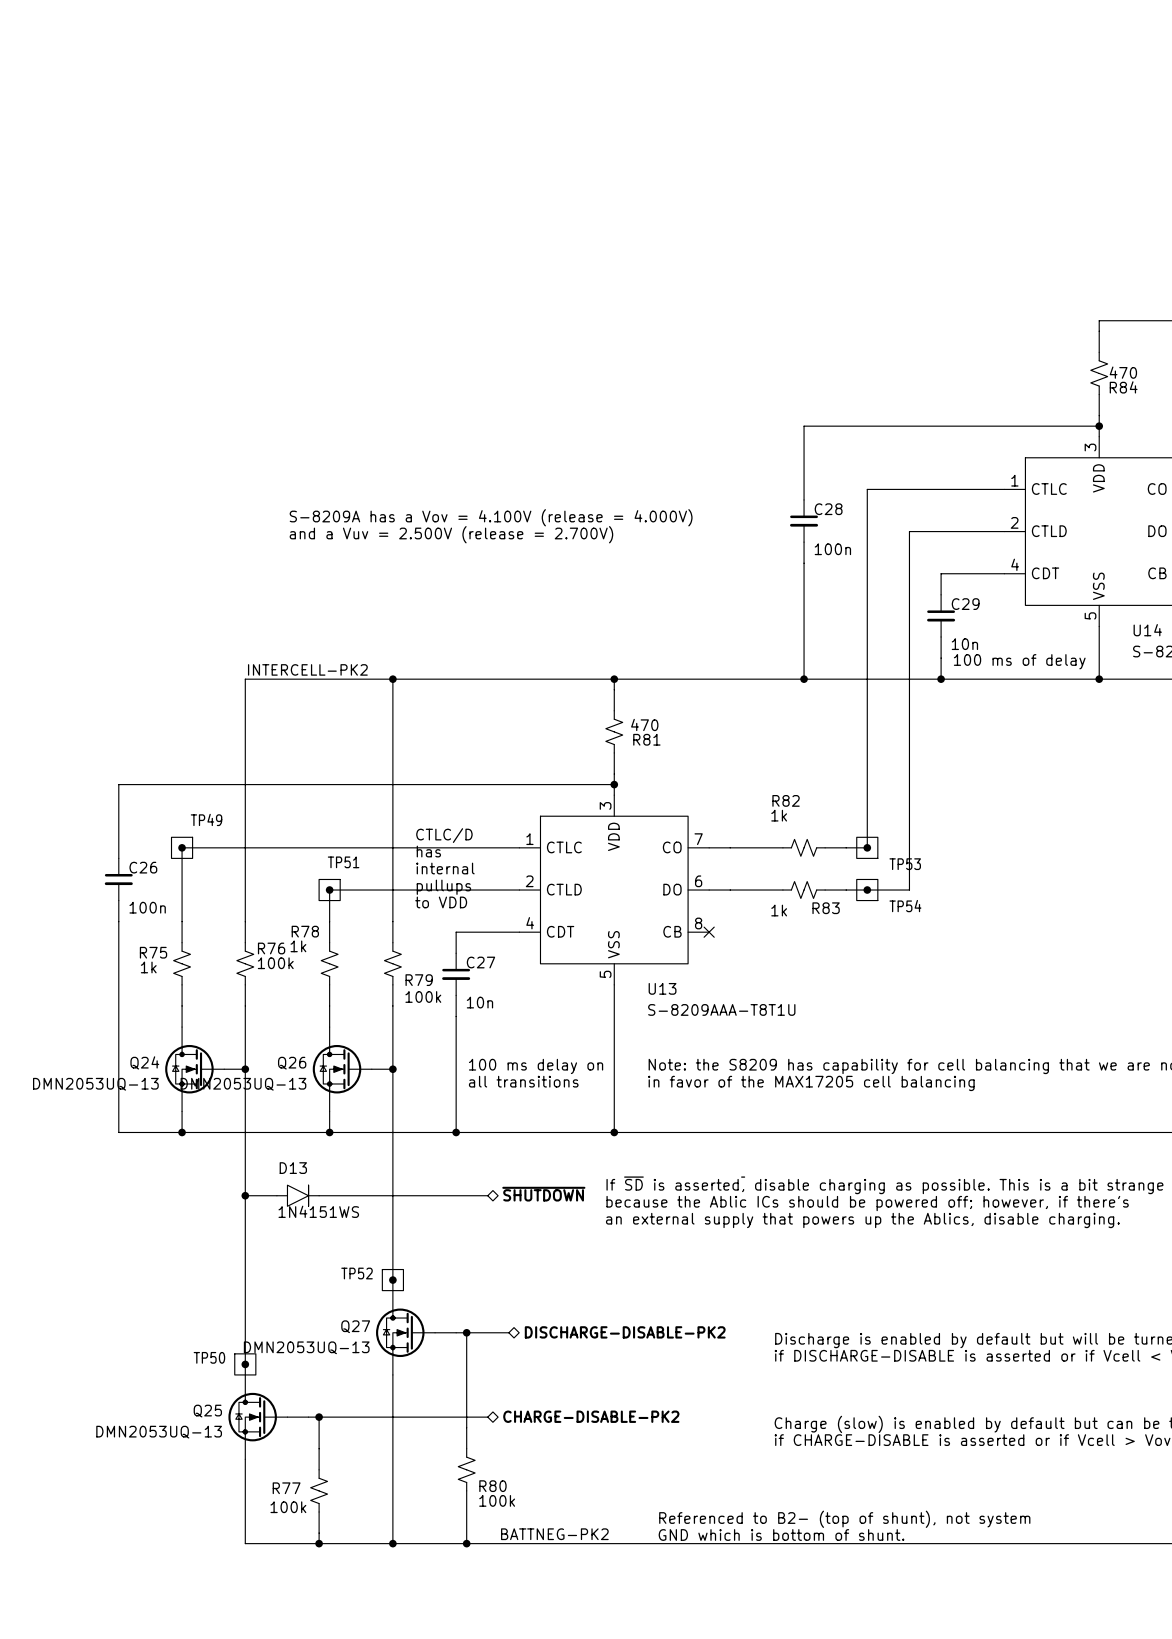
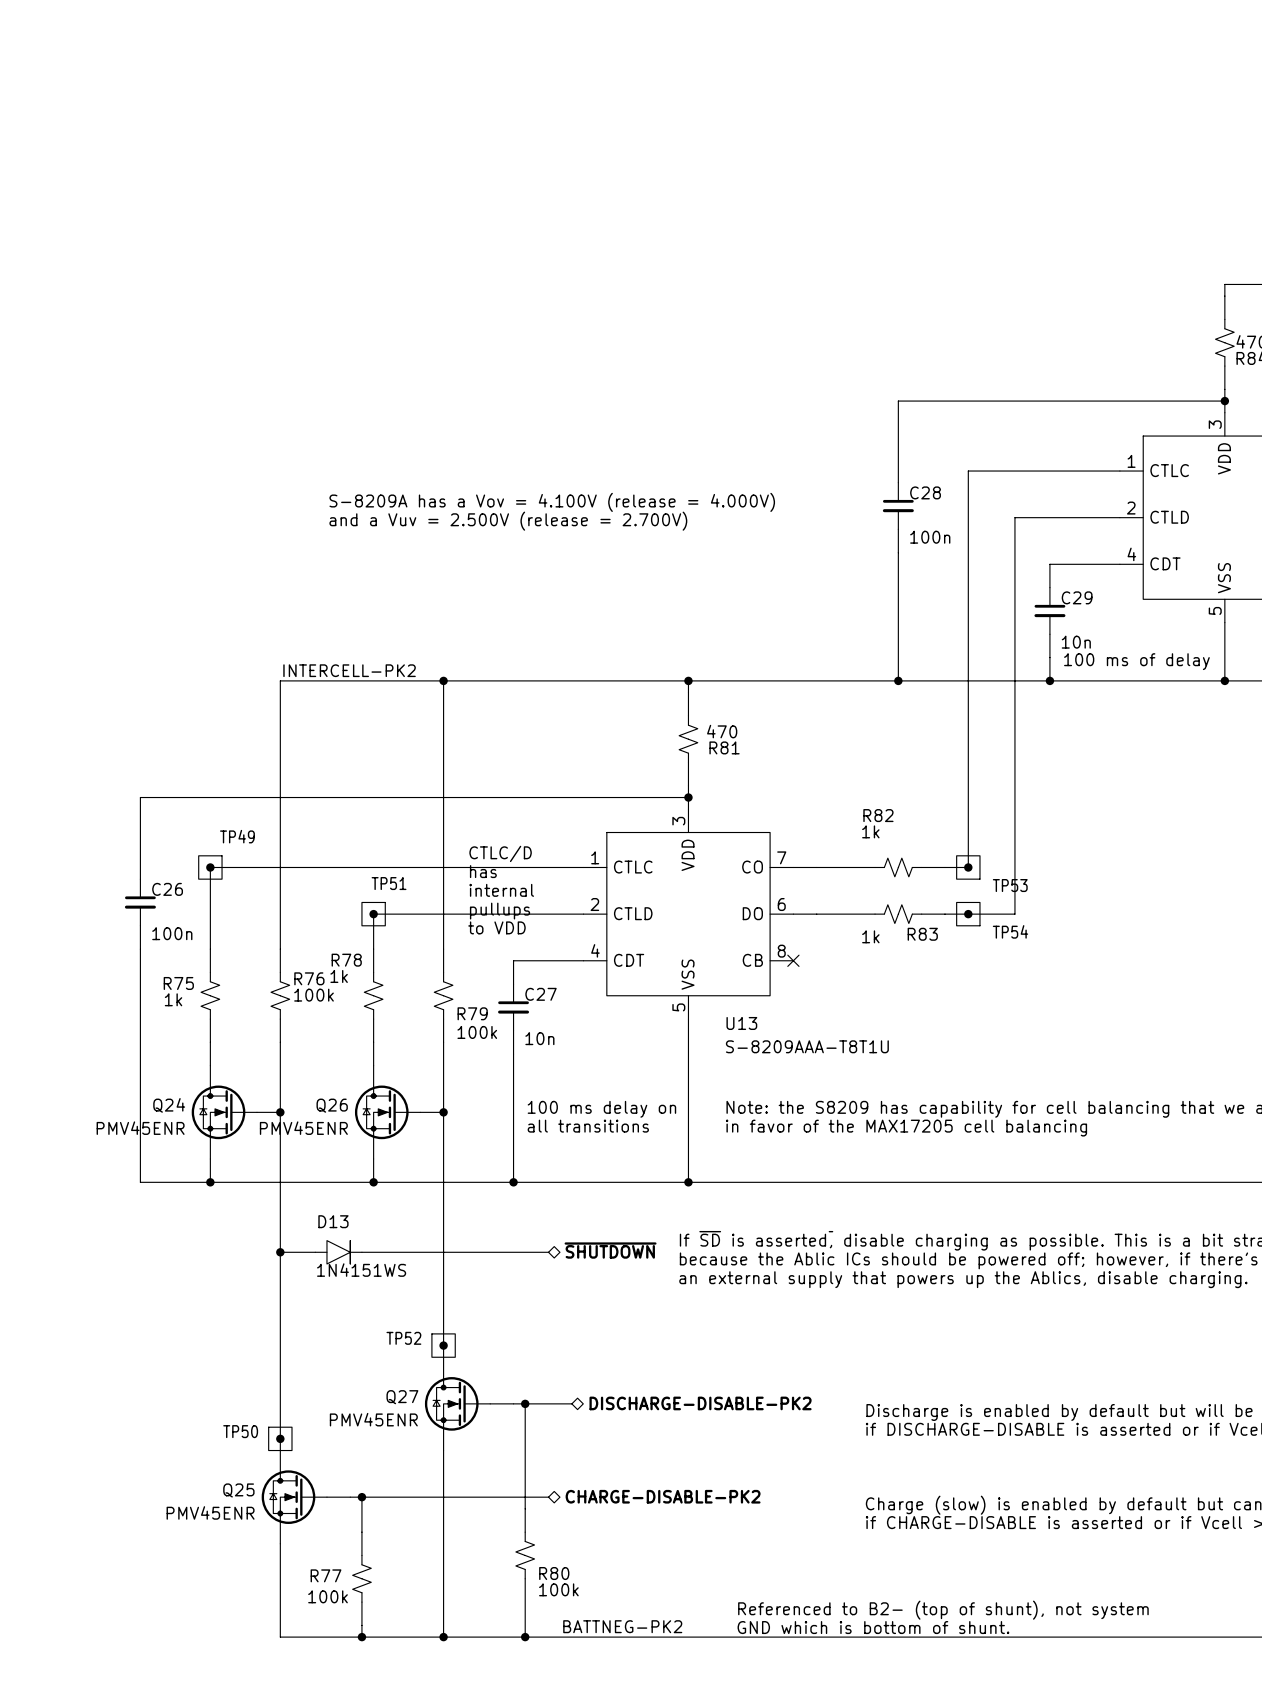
Q24 value: DMN2053UQ-13 (95, 1084) -> PMV45ENR (140, 1128)
Q26 value: DMN2053UQ-13 (243, 1084) -> PMV45ENR (303, 1128)
Q27 value: DMN2053UQ-13 (306, 1347) -> PMV45ENR (373, 1419)
Q25 value: DMN2053UQ-13 (159, 1432) -> PMV45ENR (210, 1512)

